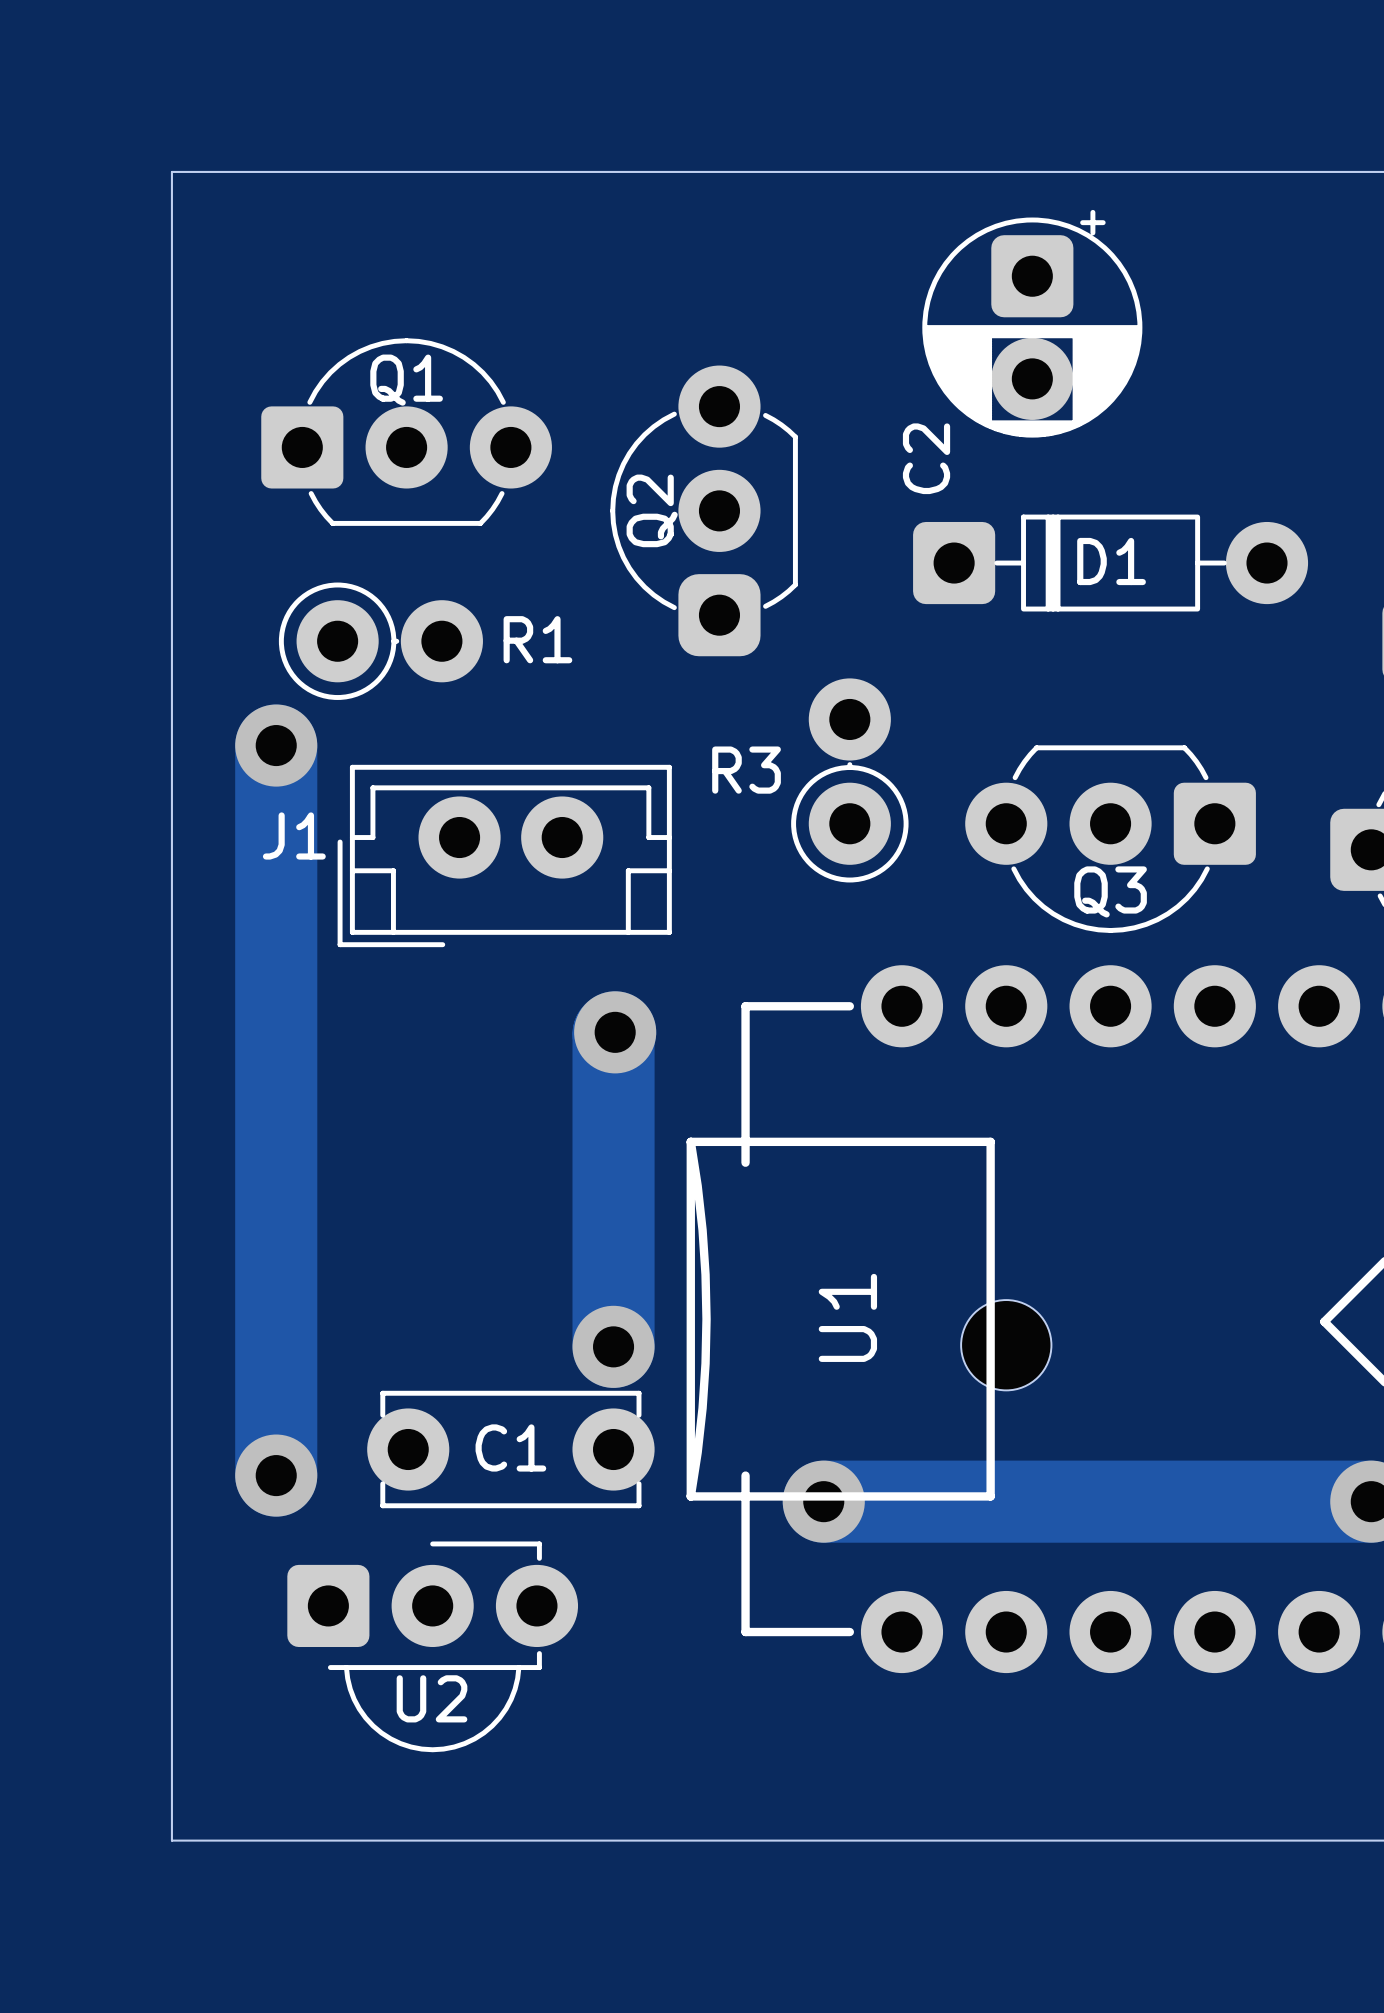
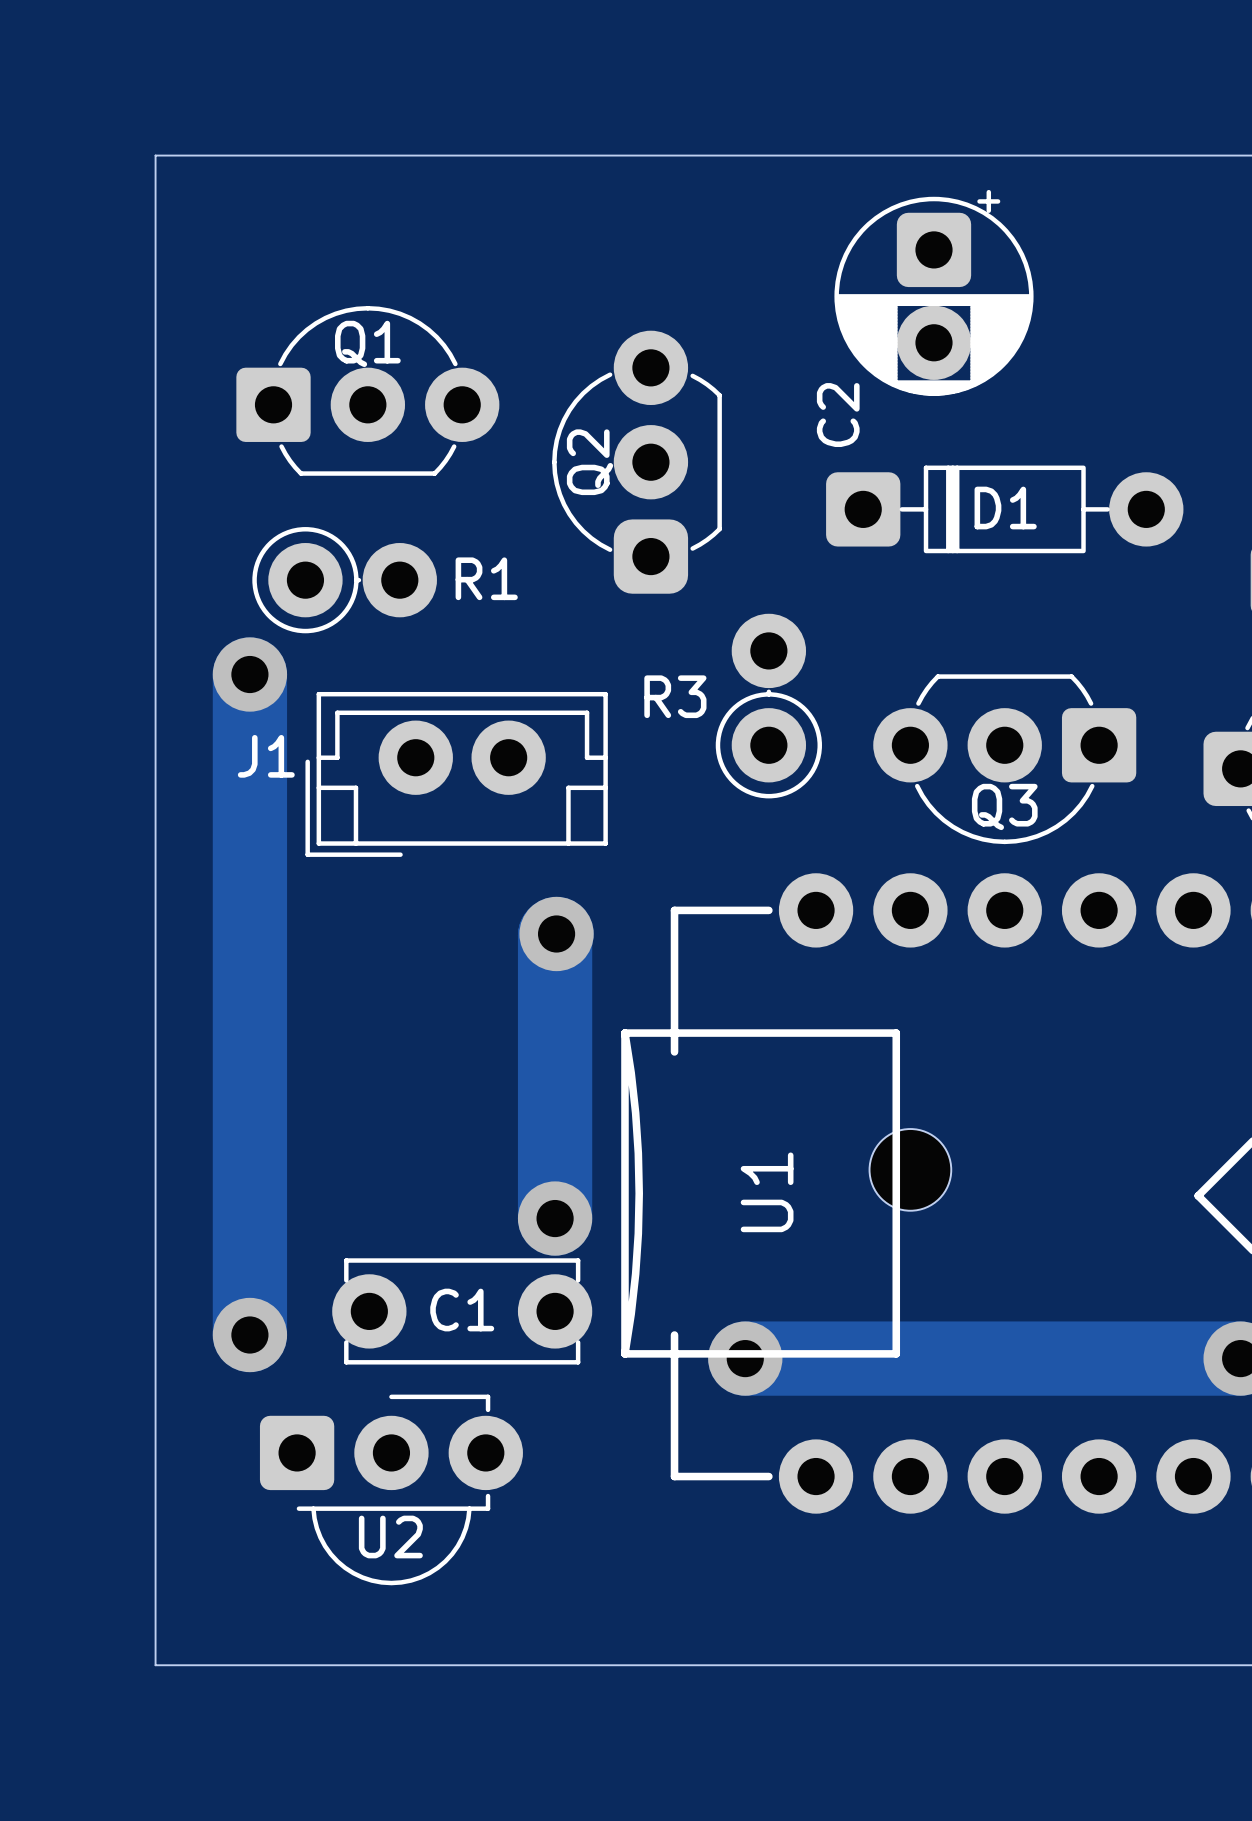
part position: (1006, 1345) -> (910, 1169)

